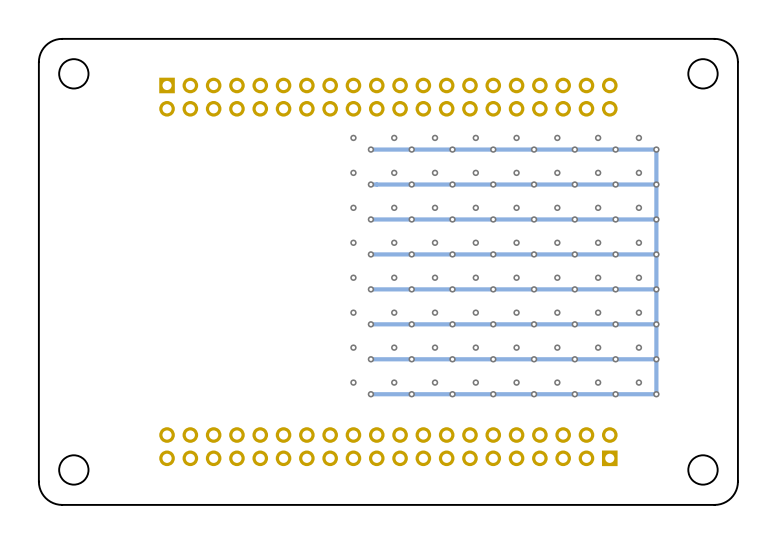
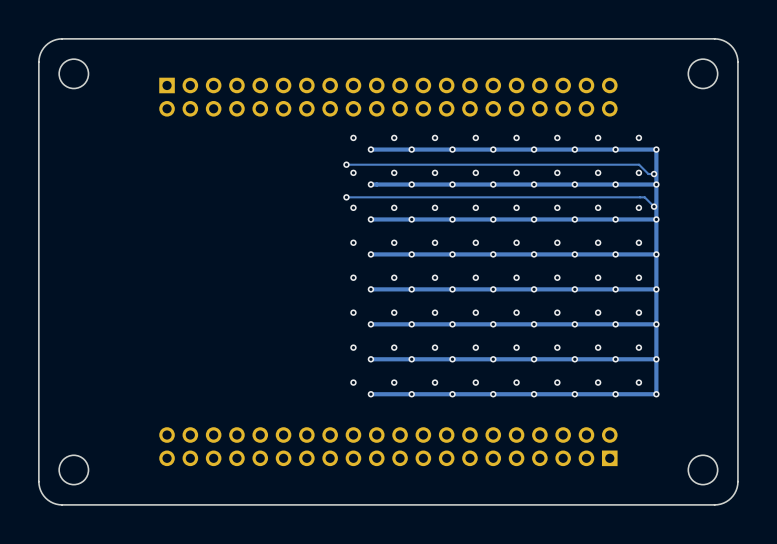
track: none -> (346, 164) (639, 164) (648, 174) (654, 174)
via: none -> (346, 164)
via: none -> (654, 174)
track: none -> (346, 197) (644, 197) (654, 206)
via: none -> (346, 197)
via: none -> (654, 206)

